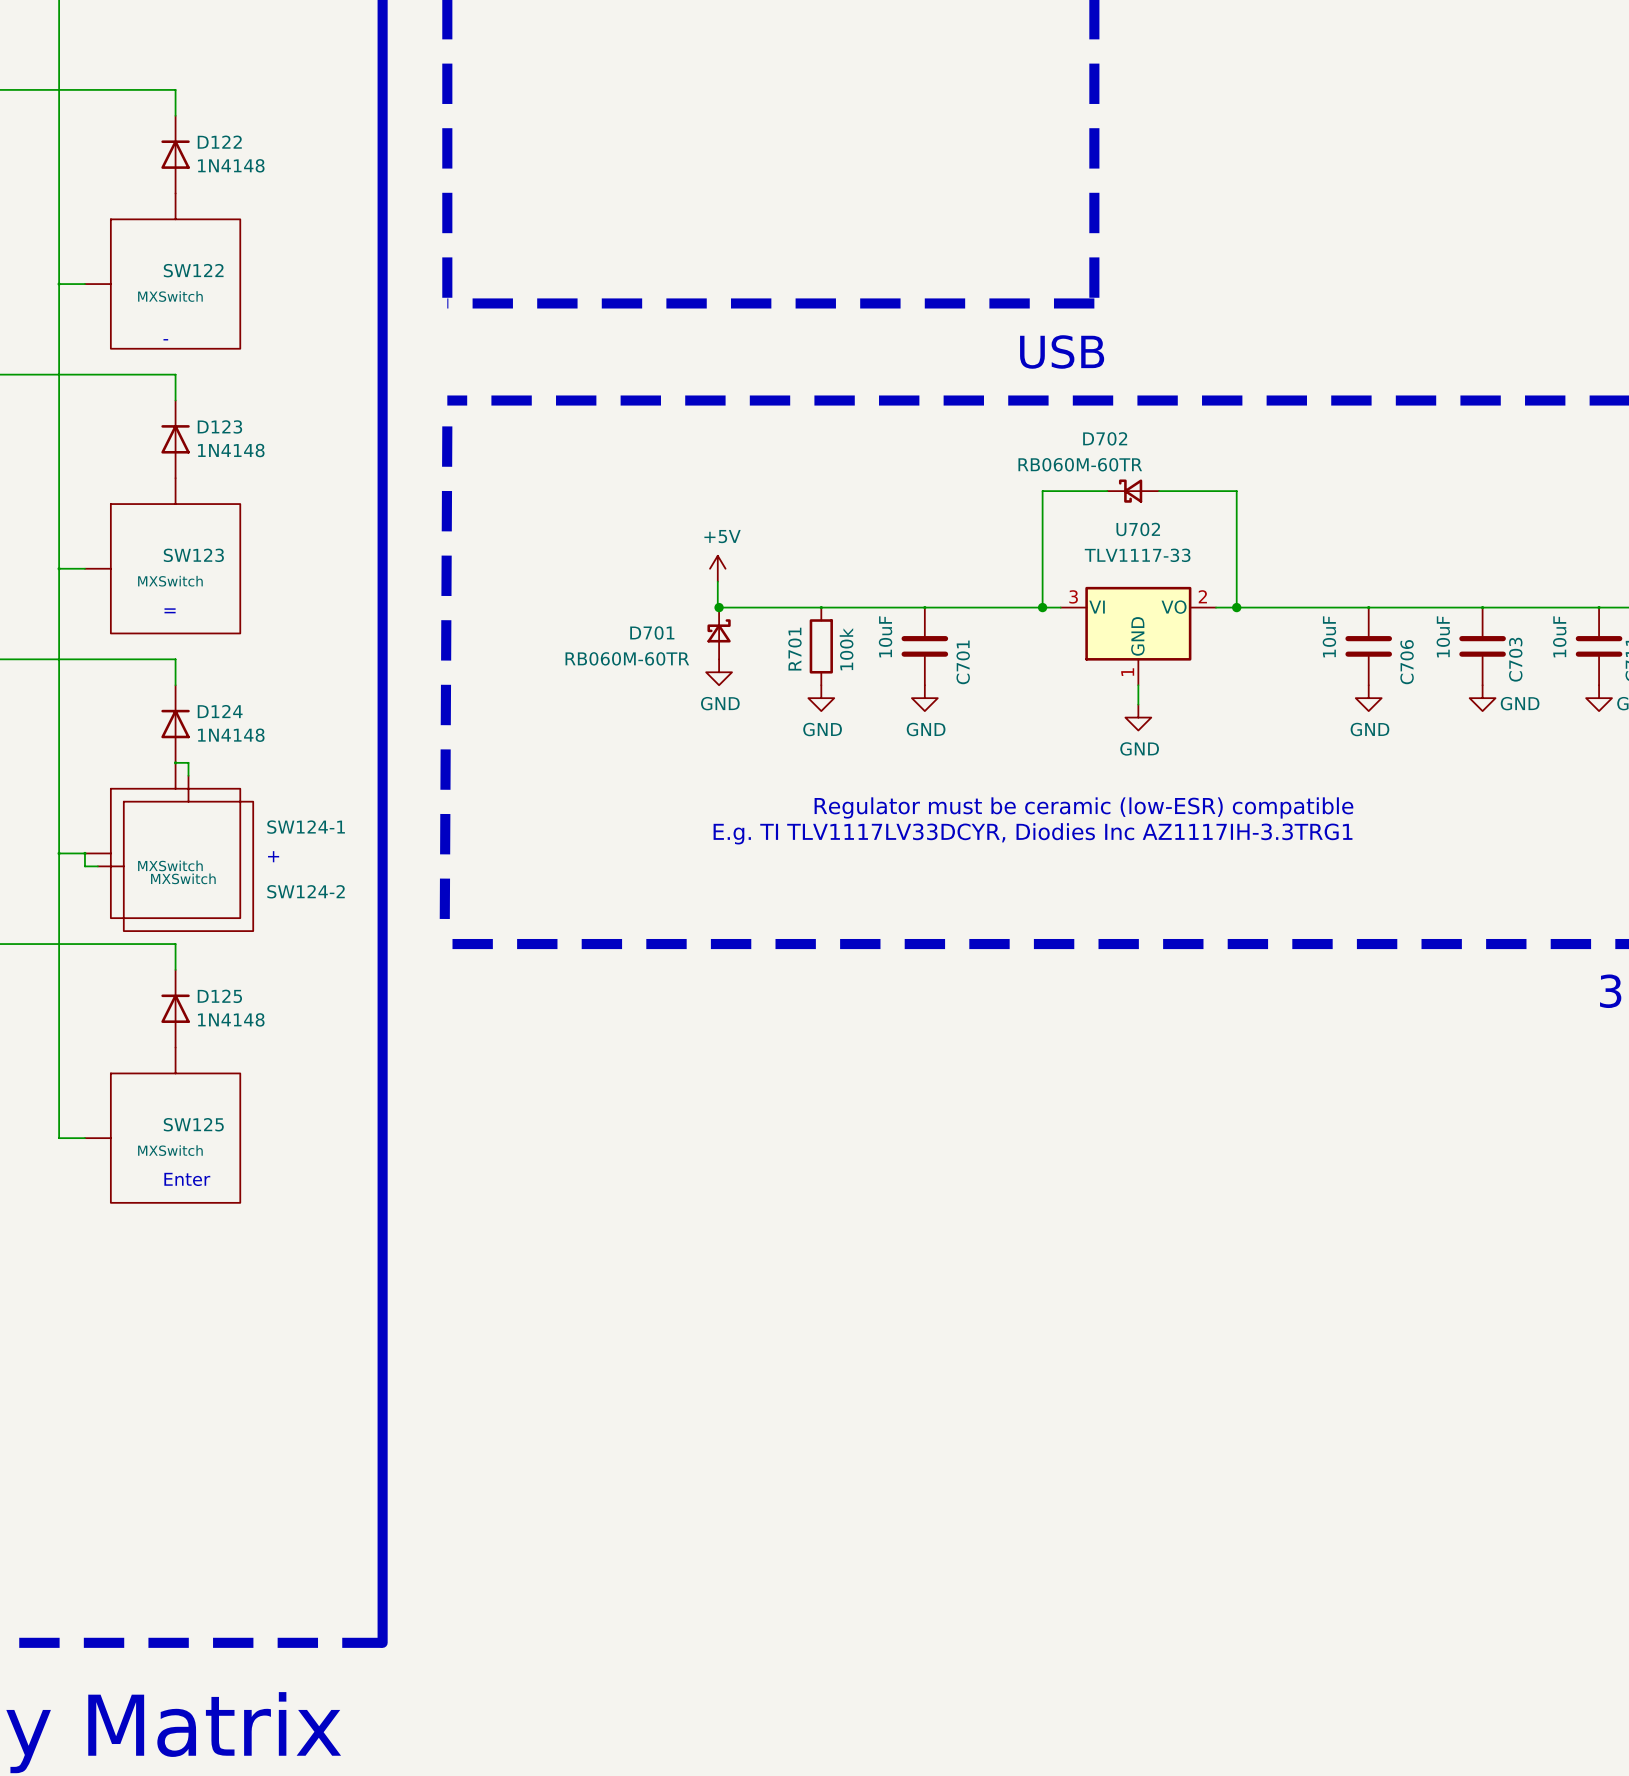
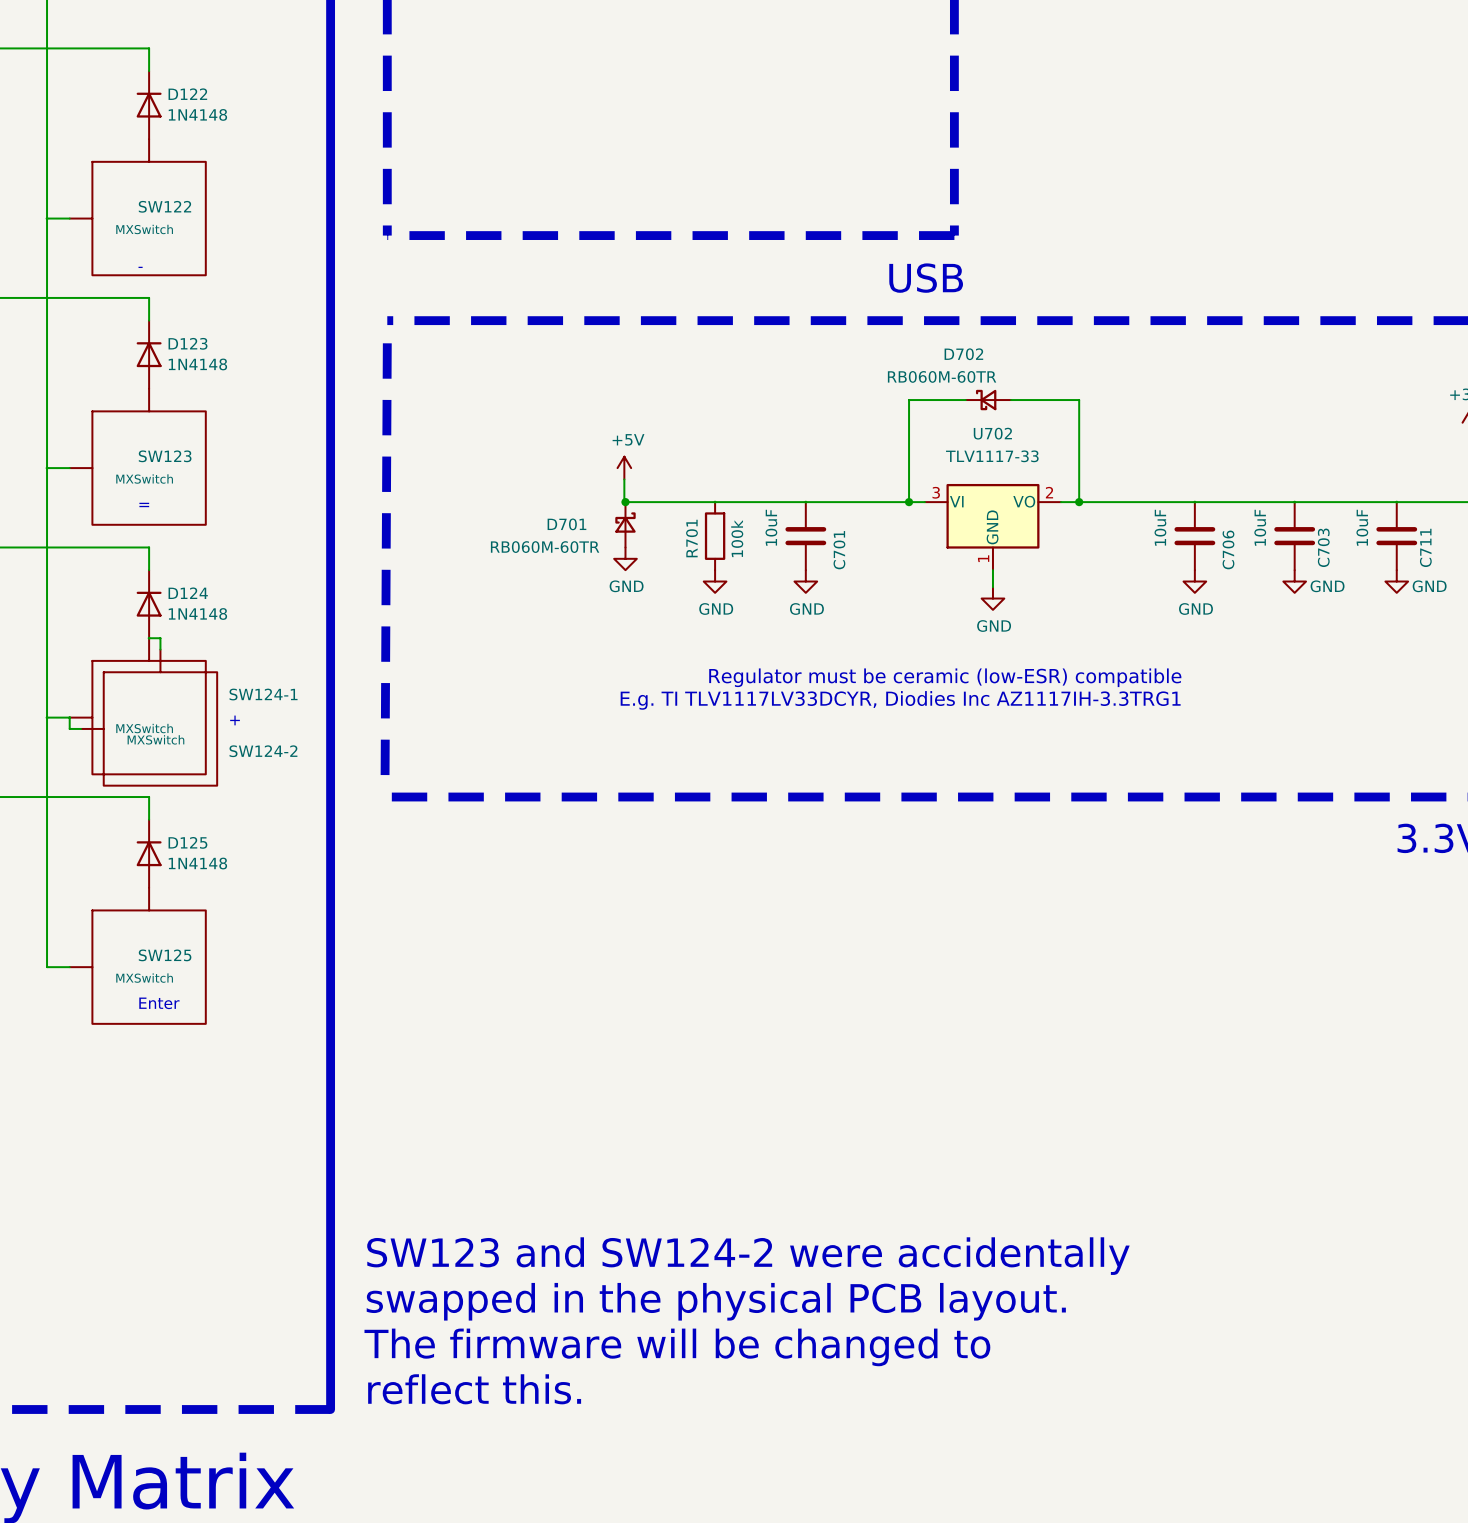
text: none -> SW123 and SW124-2 were accidentally (748, 1256)
text: none -> swapped in the physical PCB layout. (716, 1301)
text: none -> The firmware will be changed to (677, 1347)
text: none -> reflect this. (474, 1389)

